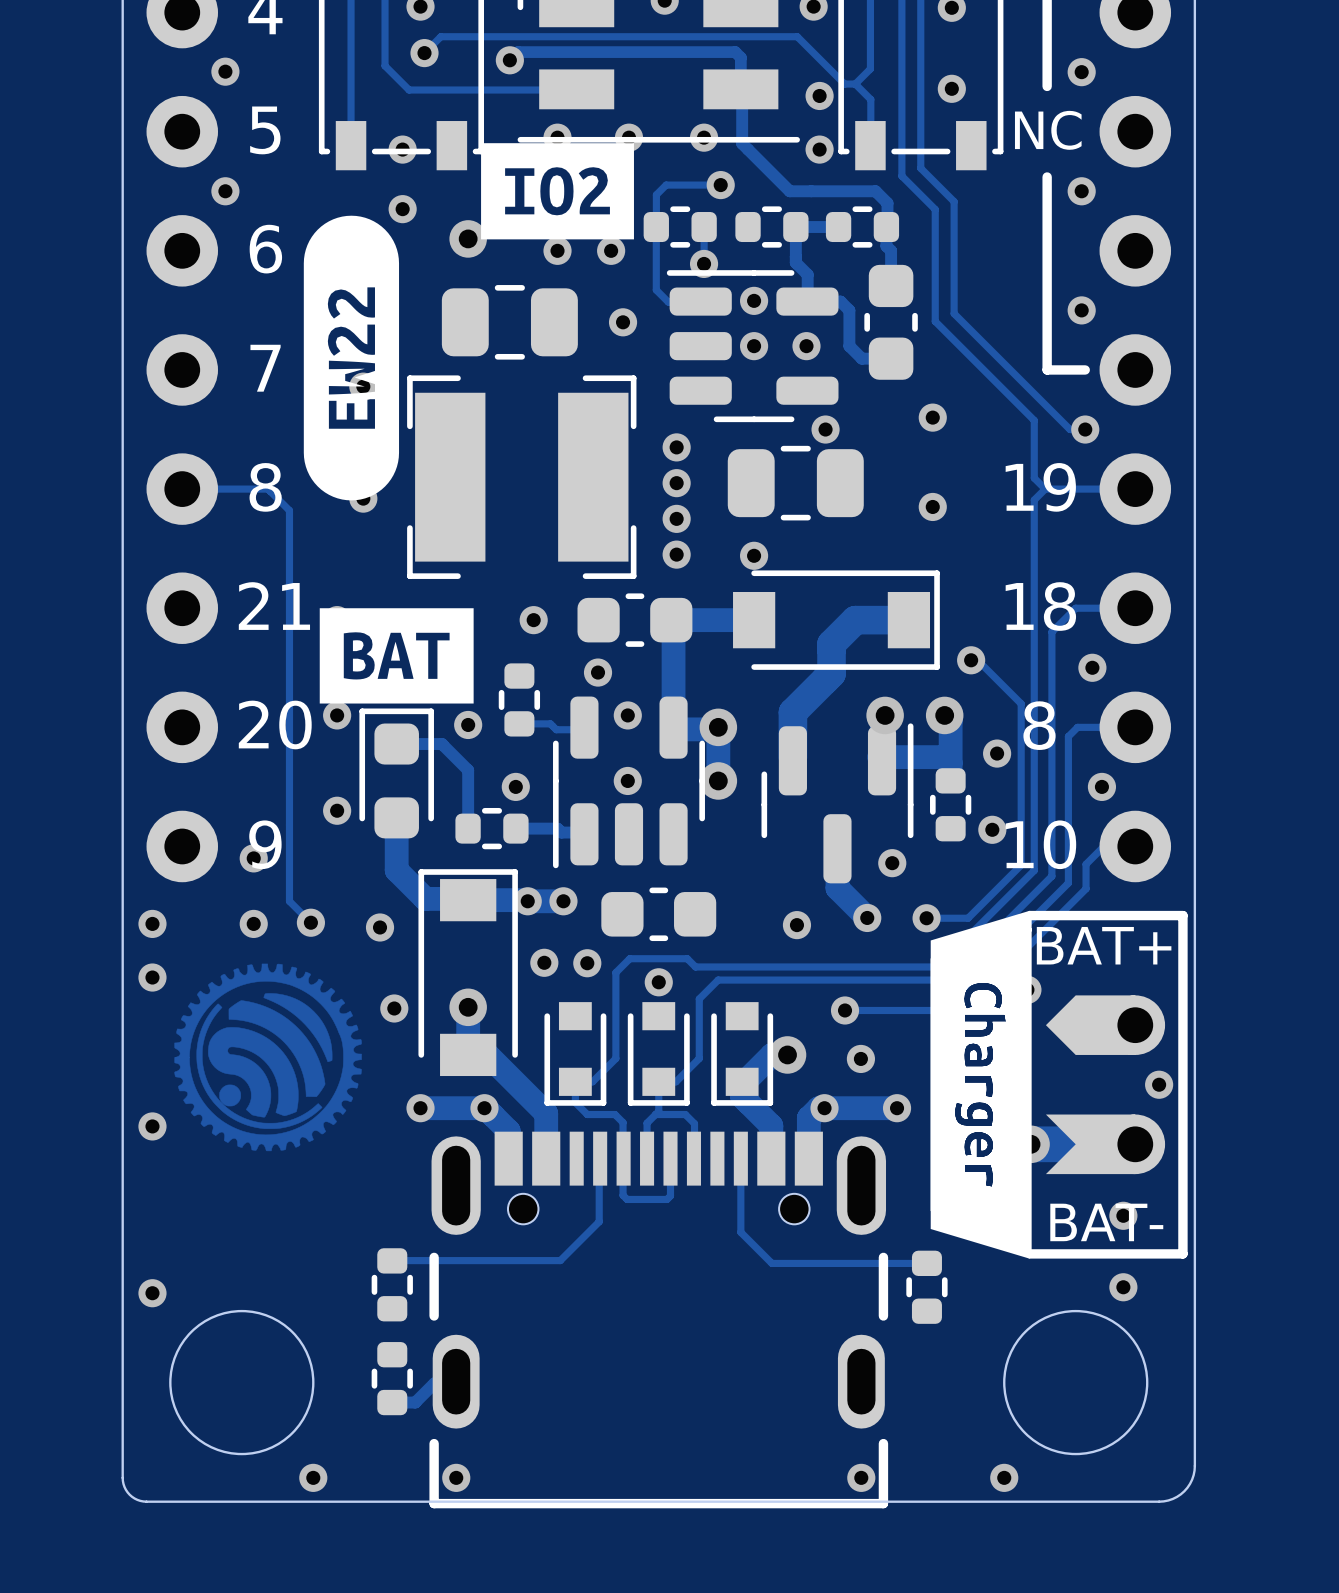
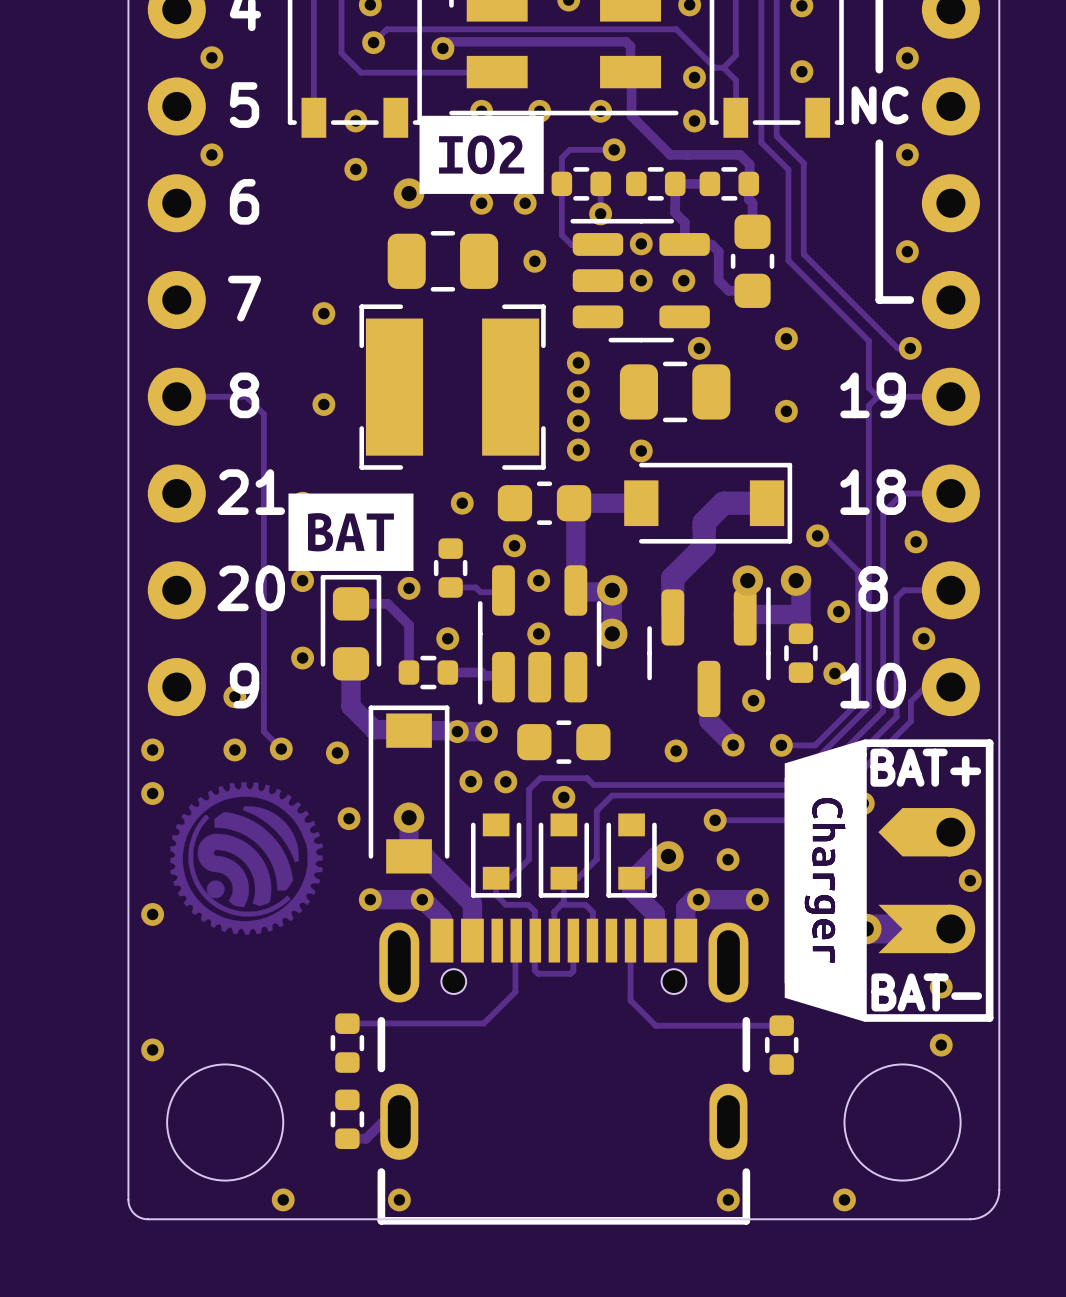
drawing: [303, 215, 400, 501] -> none

